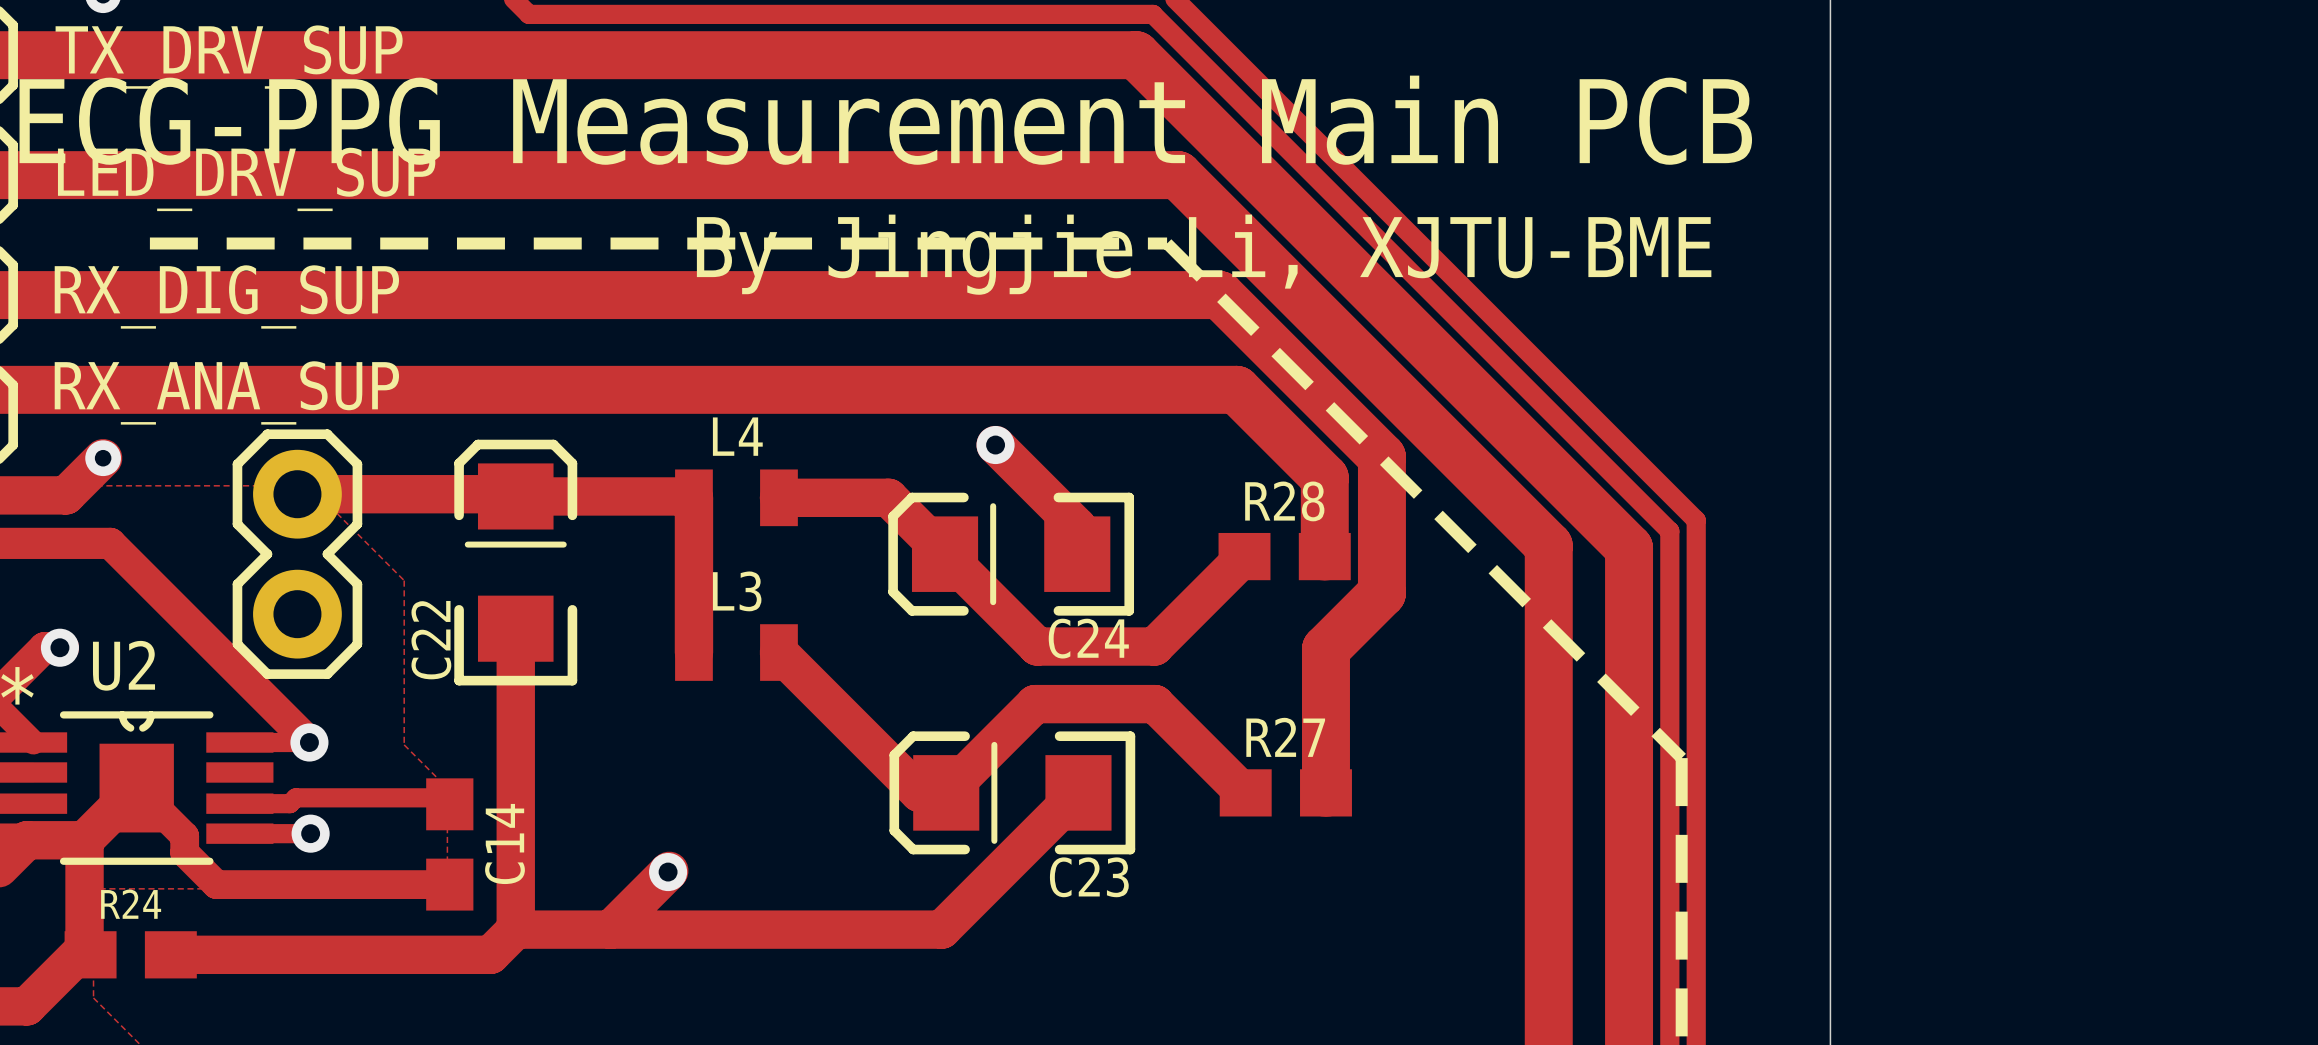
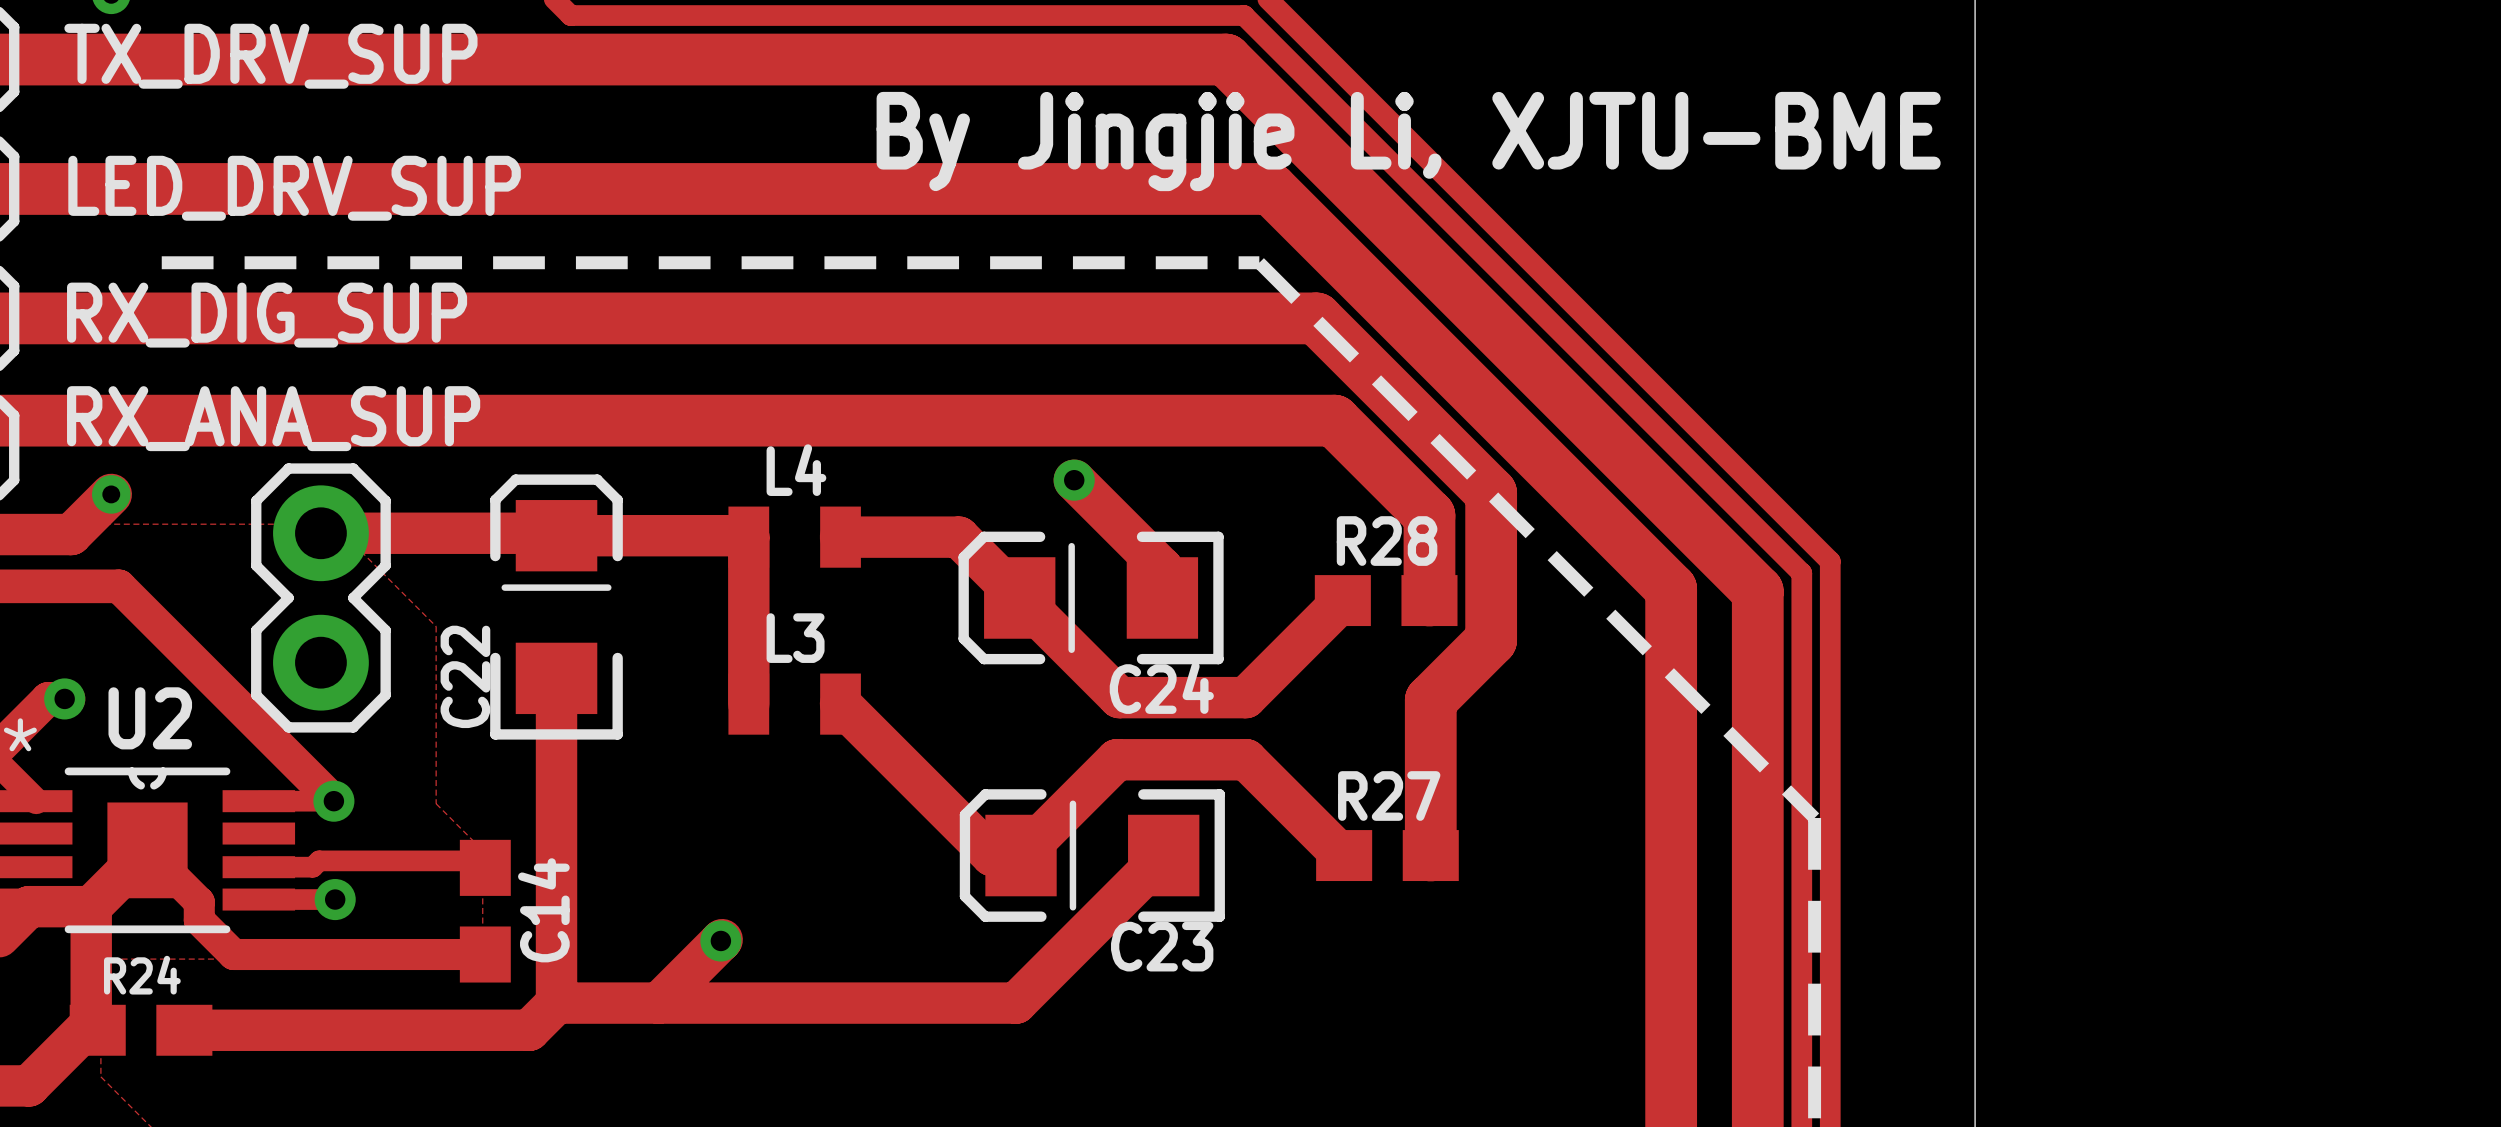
text: ECG-PPG Measurement Main PCB (885, 120) -> none
text position: By Jingjie Li, XJTU-BME (1204, 254) -> By Jingjie Li, XJTU-BME (1408, 141)

